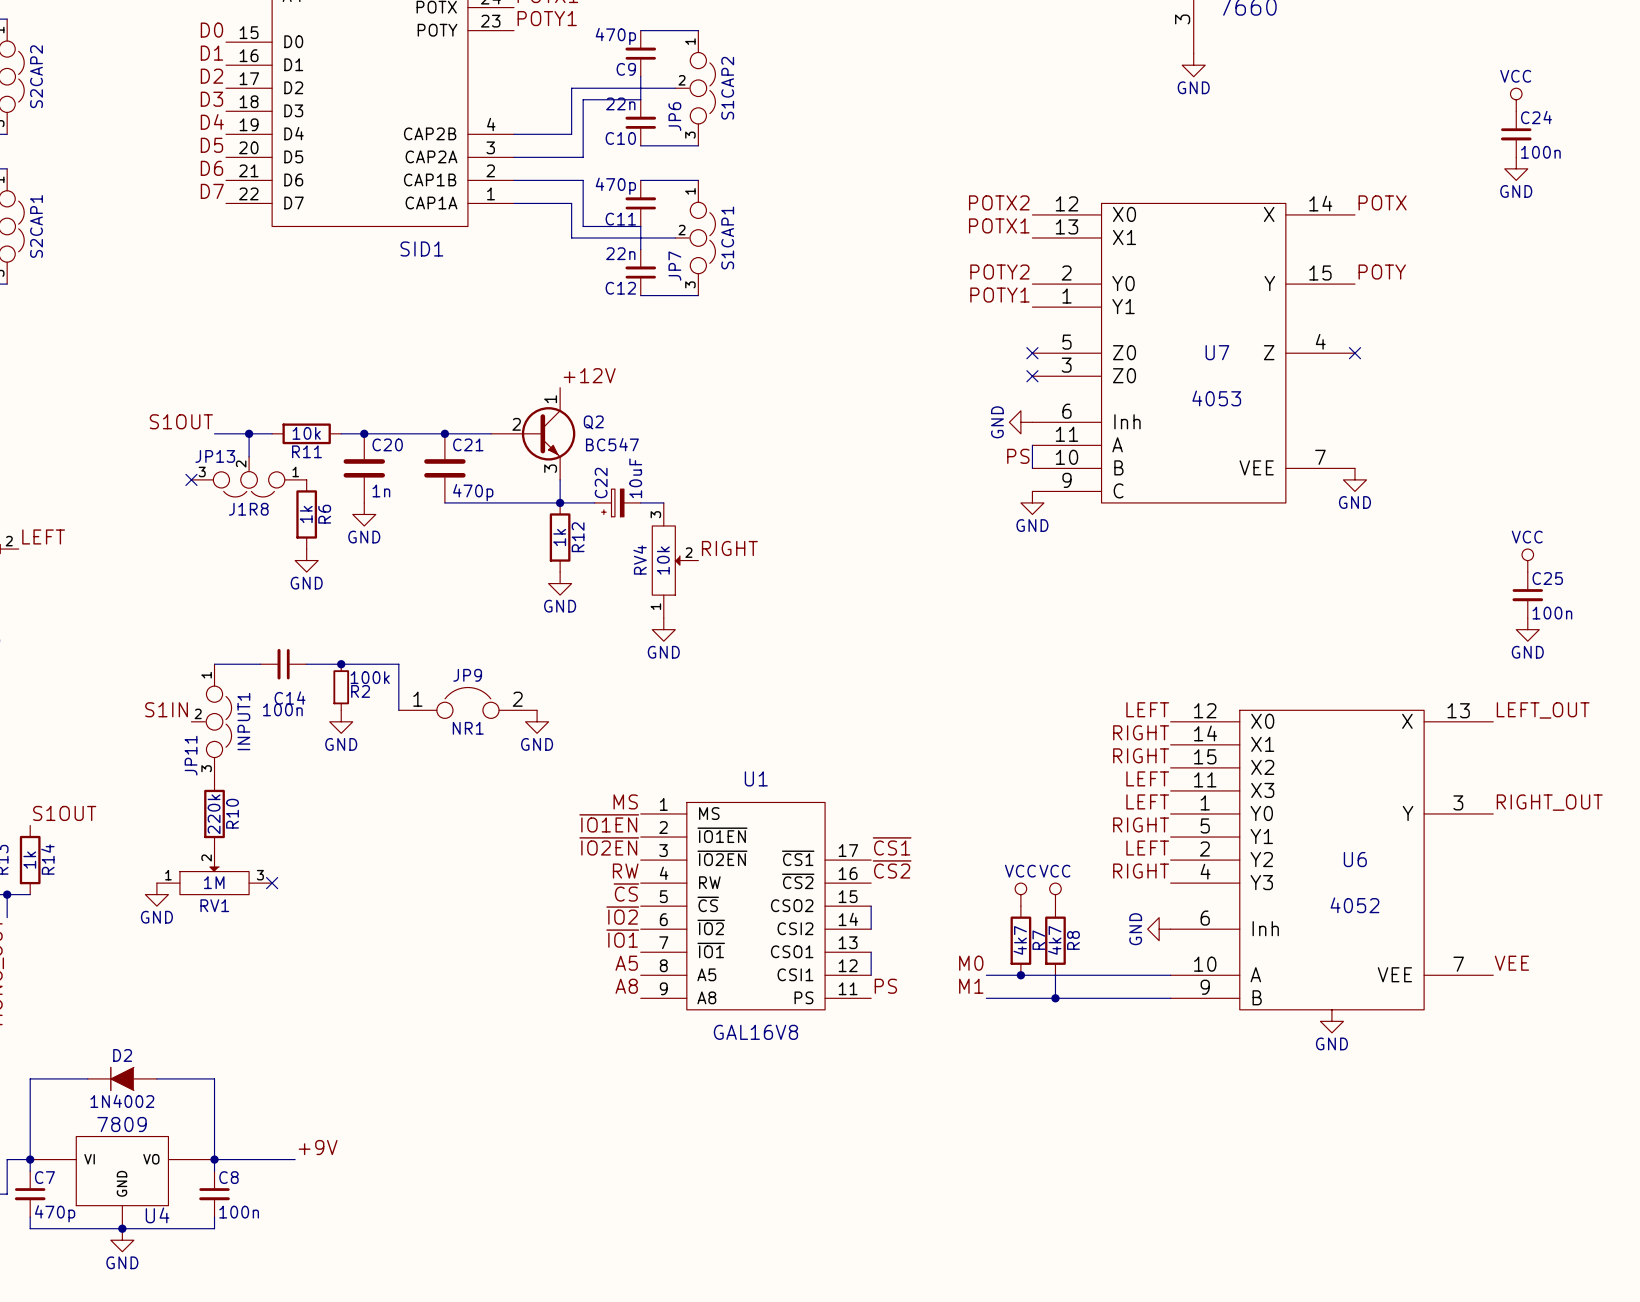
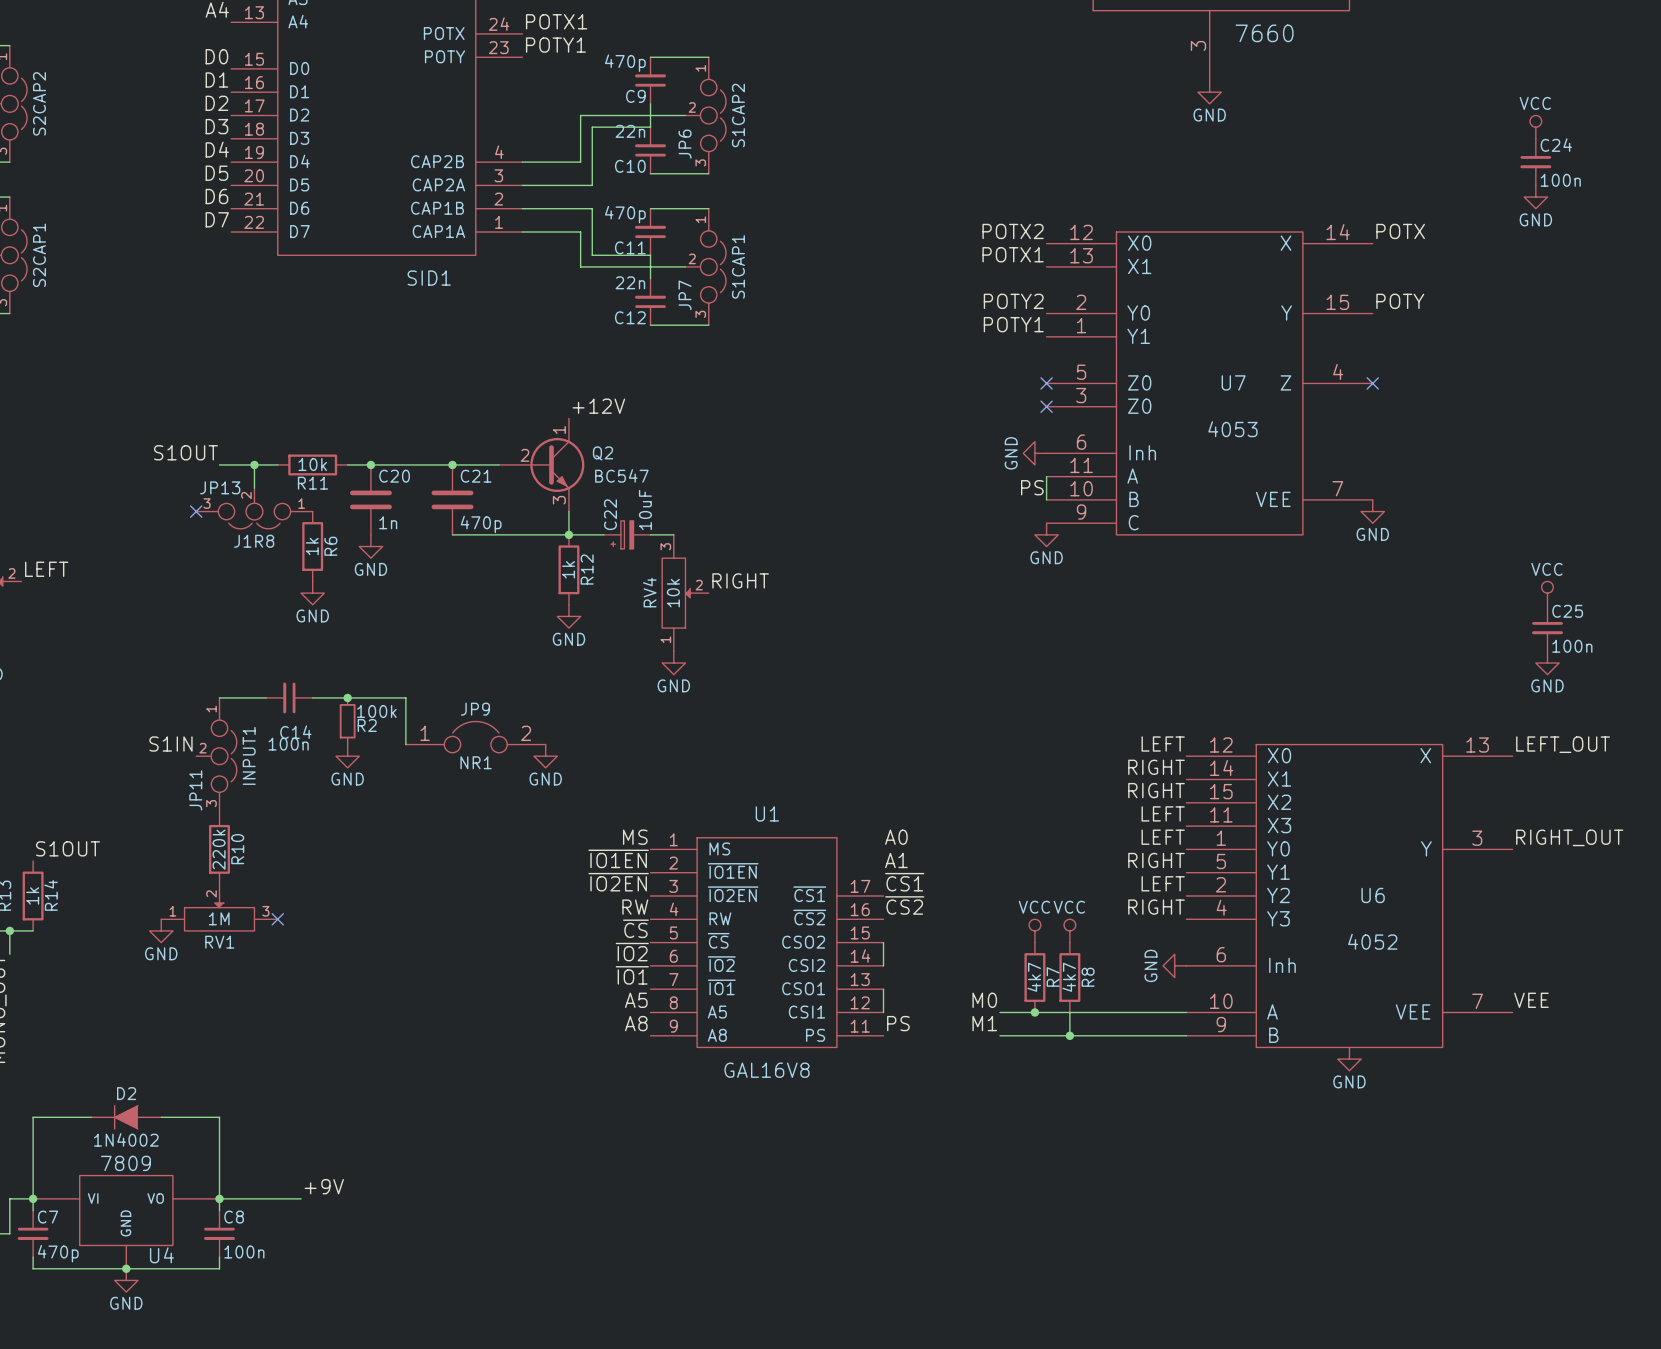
label: none -> A0 (896, 837)
label: none -> A1 (896, 860)

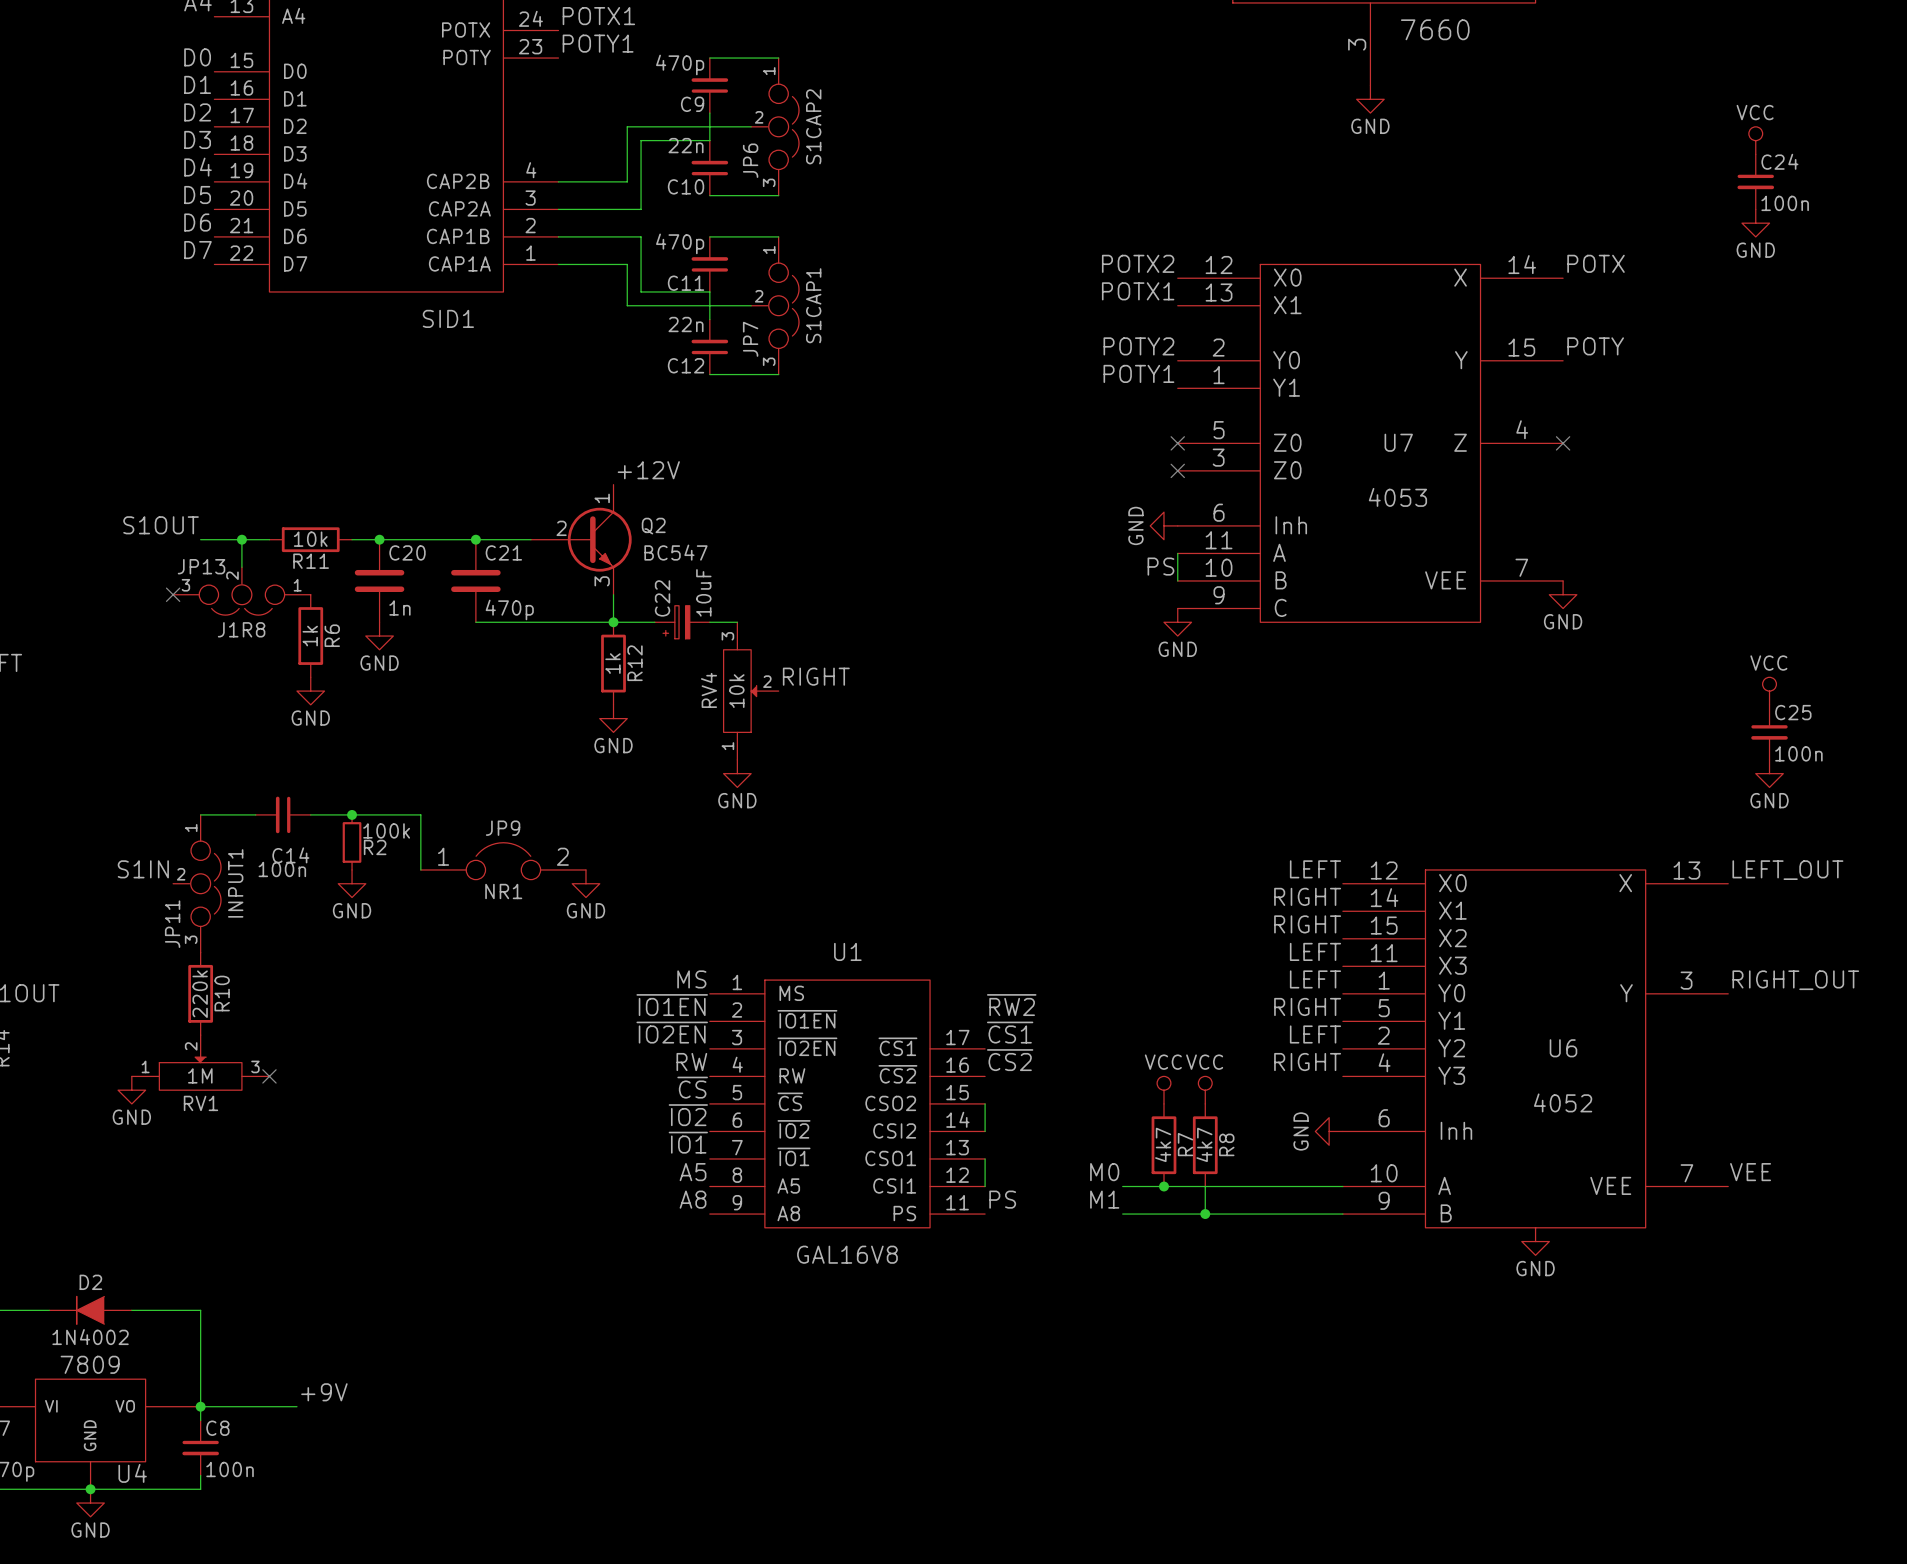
label: A0 (896, 837) -> none
label: A1 (896, 860) -> ~{RW2} (1011, 1005)

